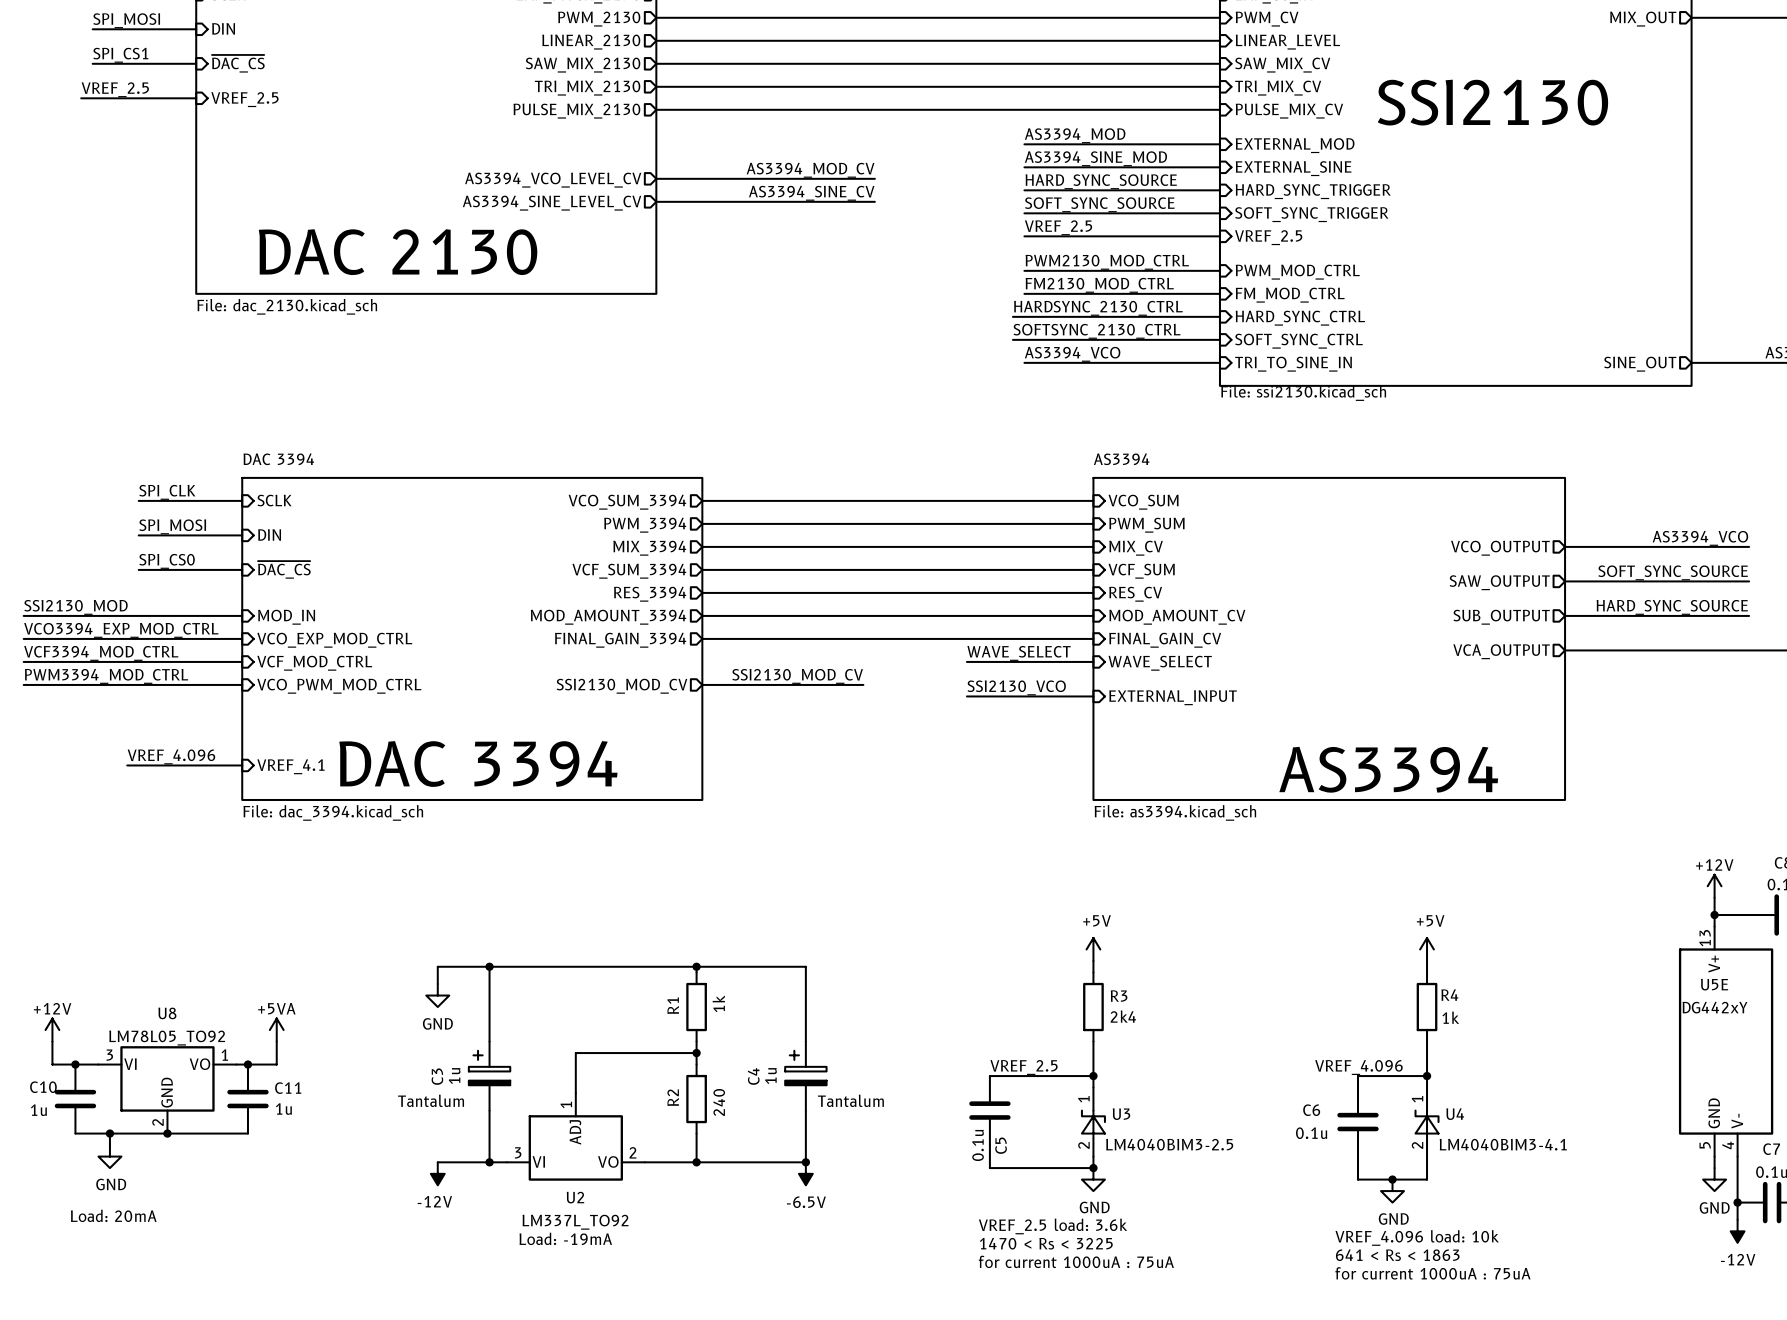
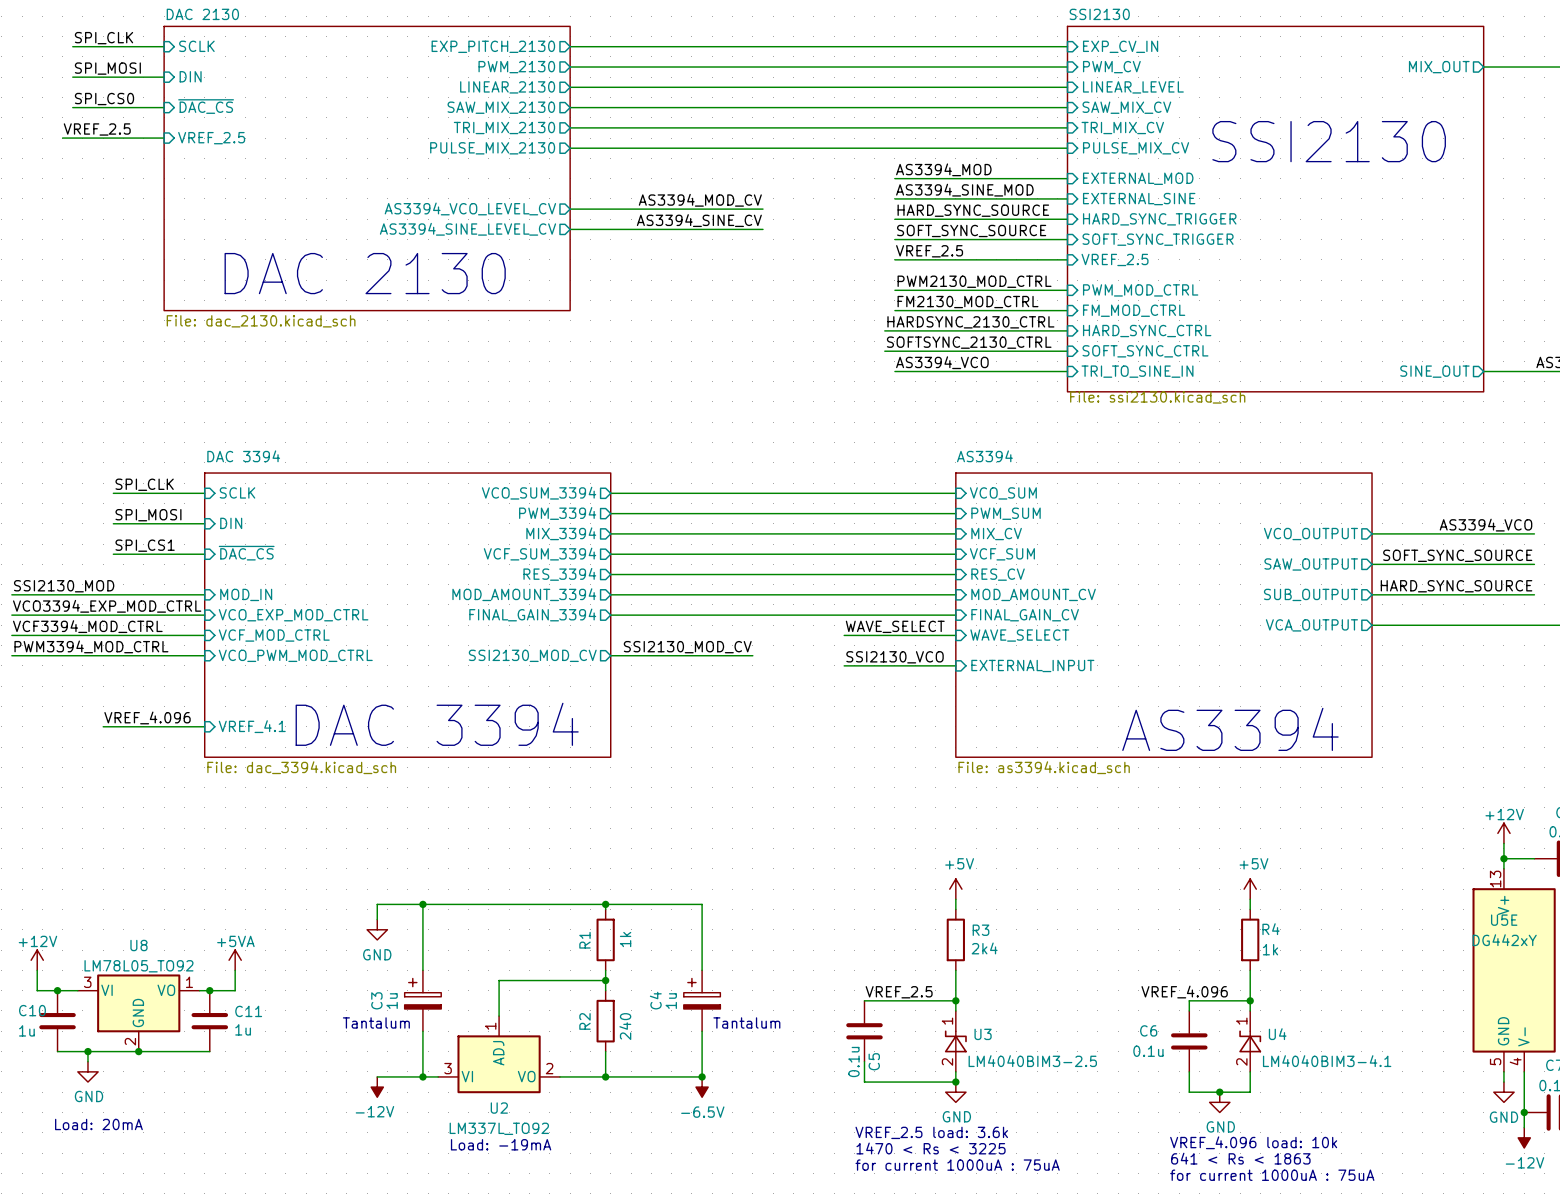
label: SPI_CS1 (120, 55) -> SPI_CS0 (104, 99)
label: SPI_CS0 (167, 561) -> SPI_CS1 (145, 545)

